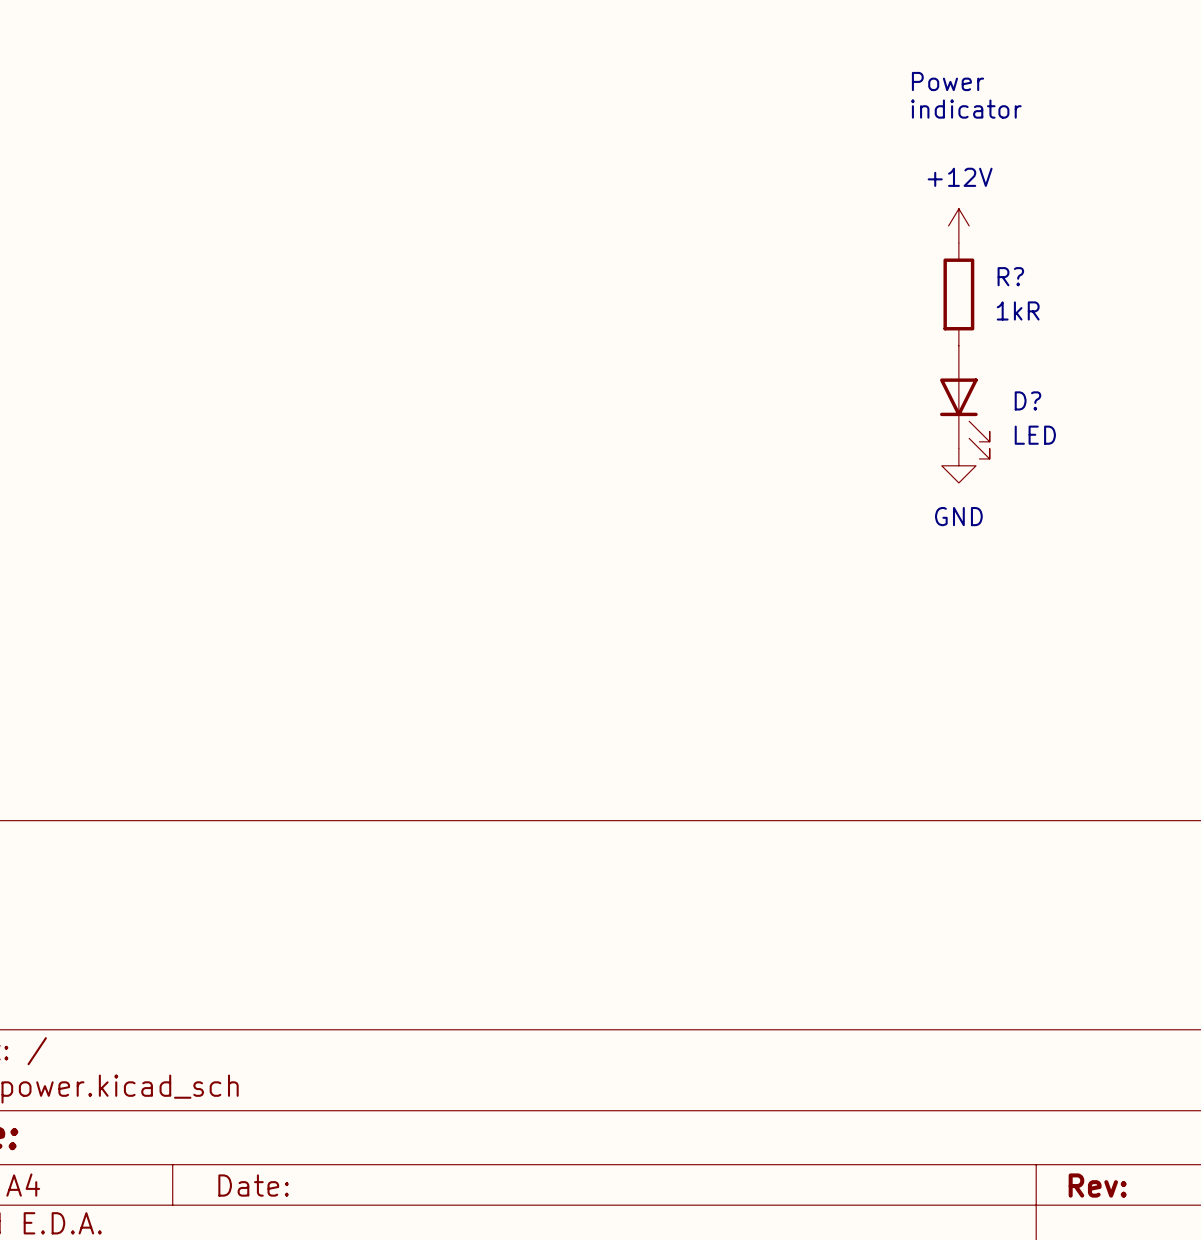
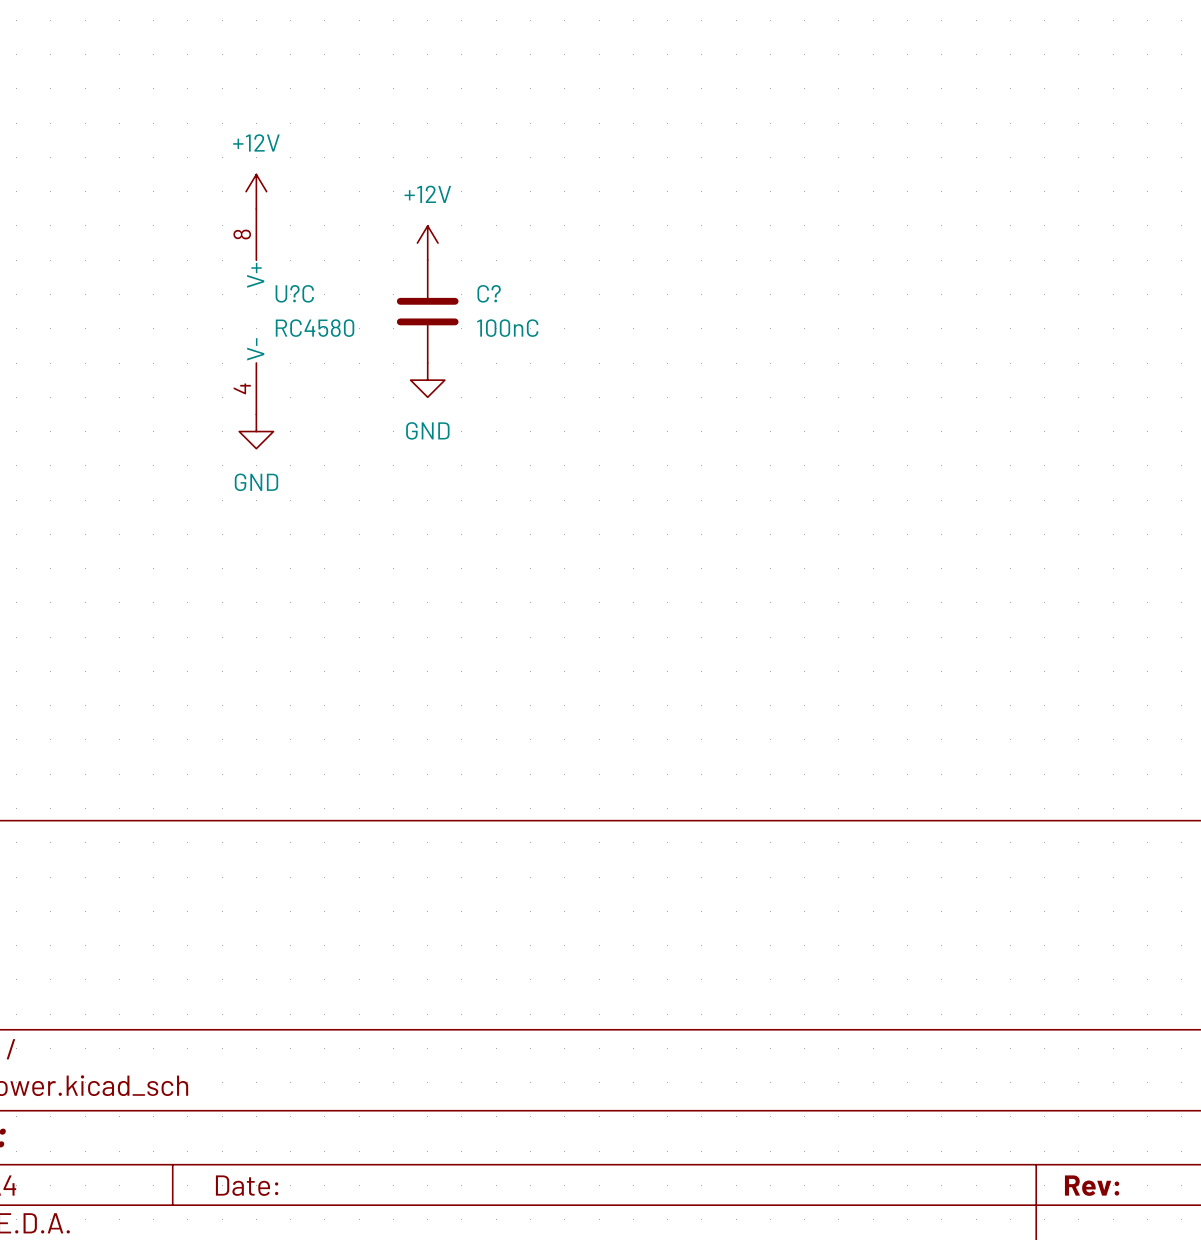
text: Power (948, 81) -> none
text: indicator (966, 109) -> none
power symbol: none -> +12V (256, 191)
power symbol: +12V (958, 225) -> none
power symbol: none -> +12V (427, 243)
R?: 1kR (958, 294) -> none
U?C: none -> RC4580 (256, 311)
C?: none -> 100nC (427, 311)
power symbol: none -> GND (427, 380)
D?: LED (964, 402) -> none
power symbol: none -> GND (256, 431)
power symbol: GND (958, 465) -> none

